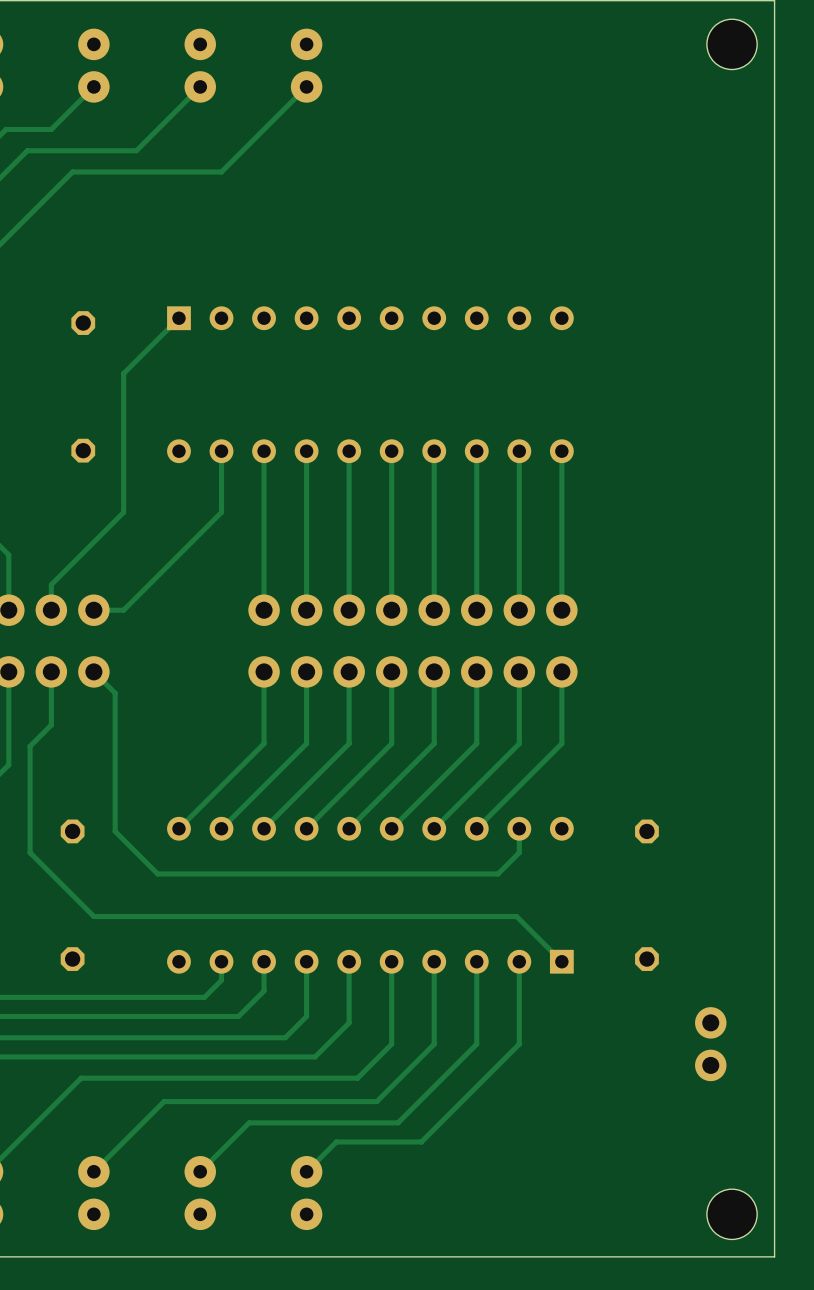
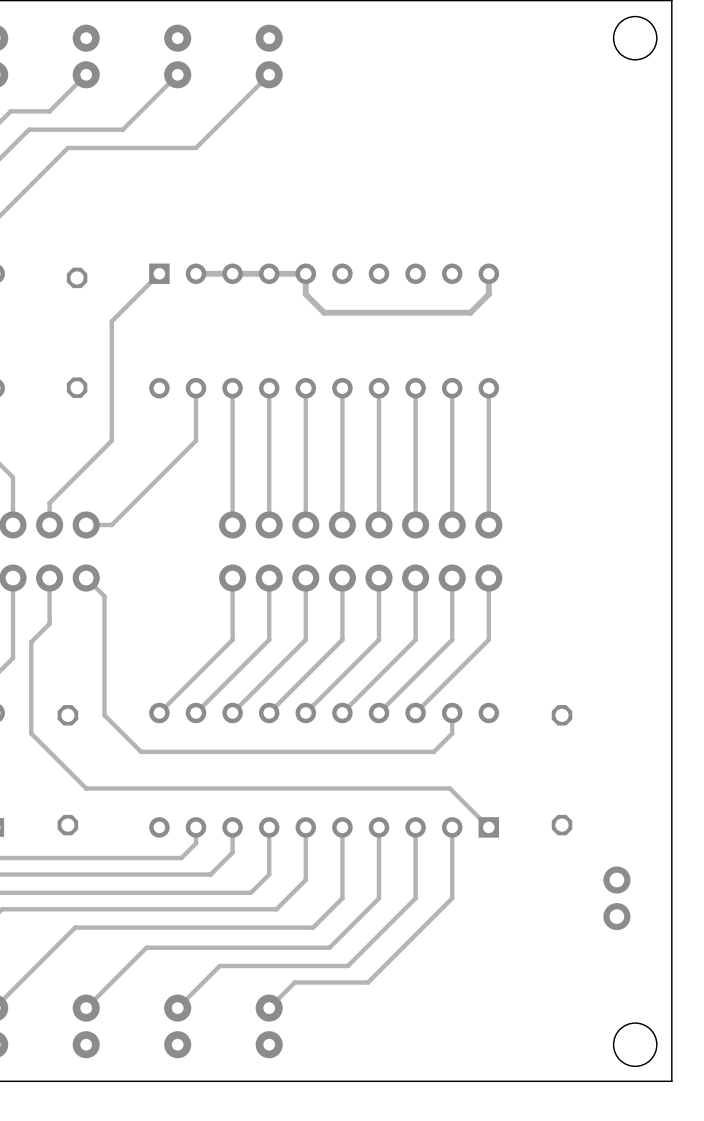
track: none -> (488, 273) (488, 294) (470, 312) (324, 312) (305, 294) (305, 273) (196, 273)

